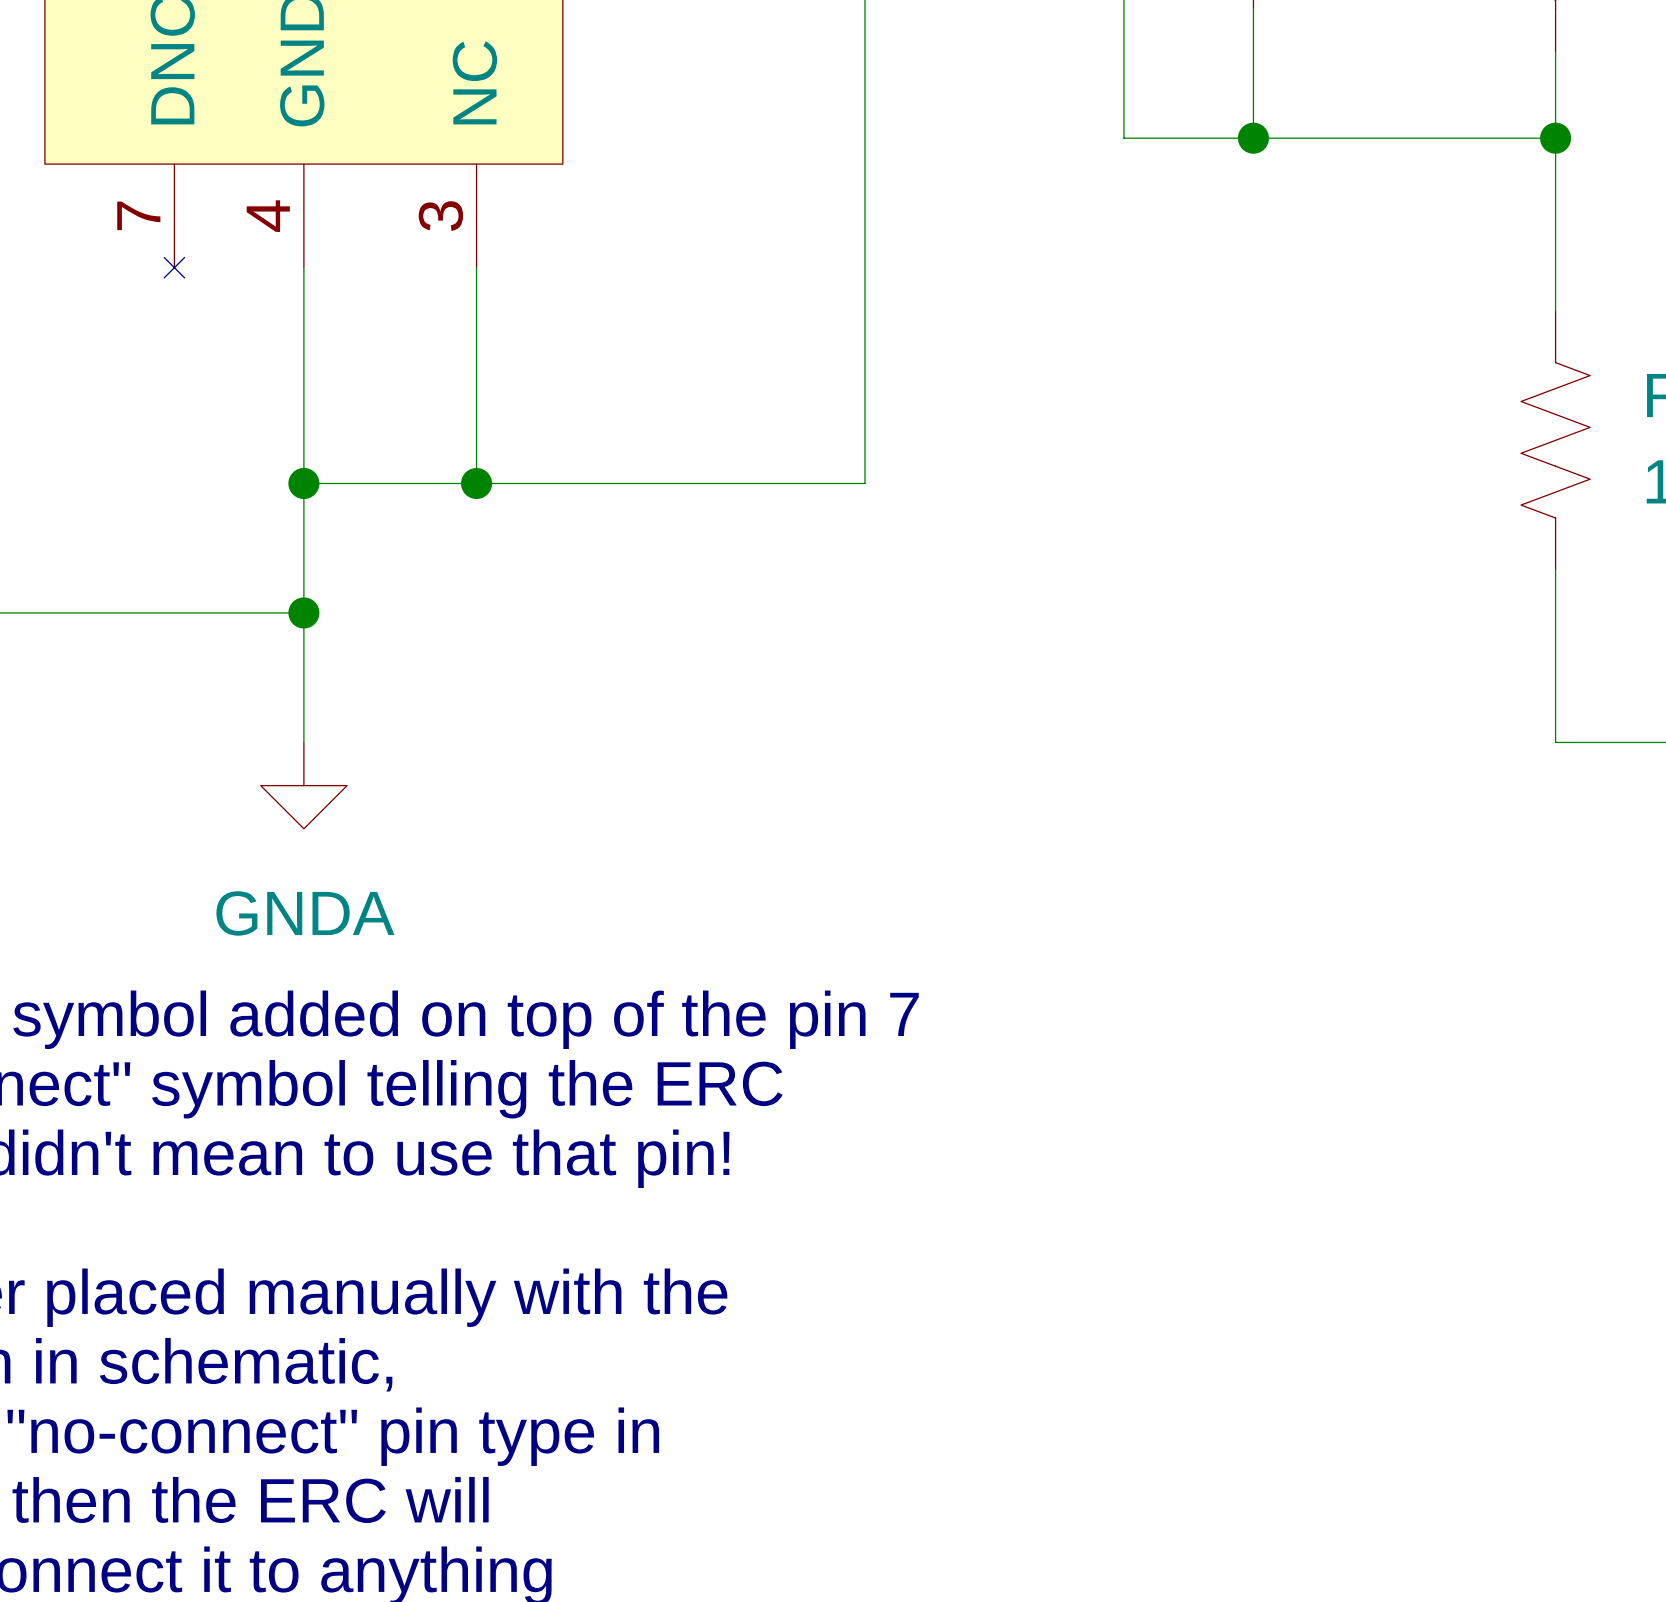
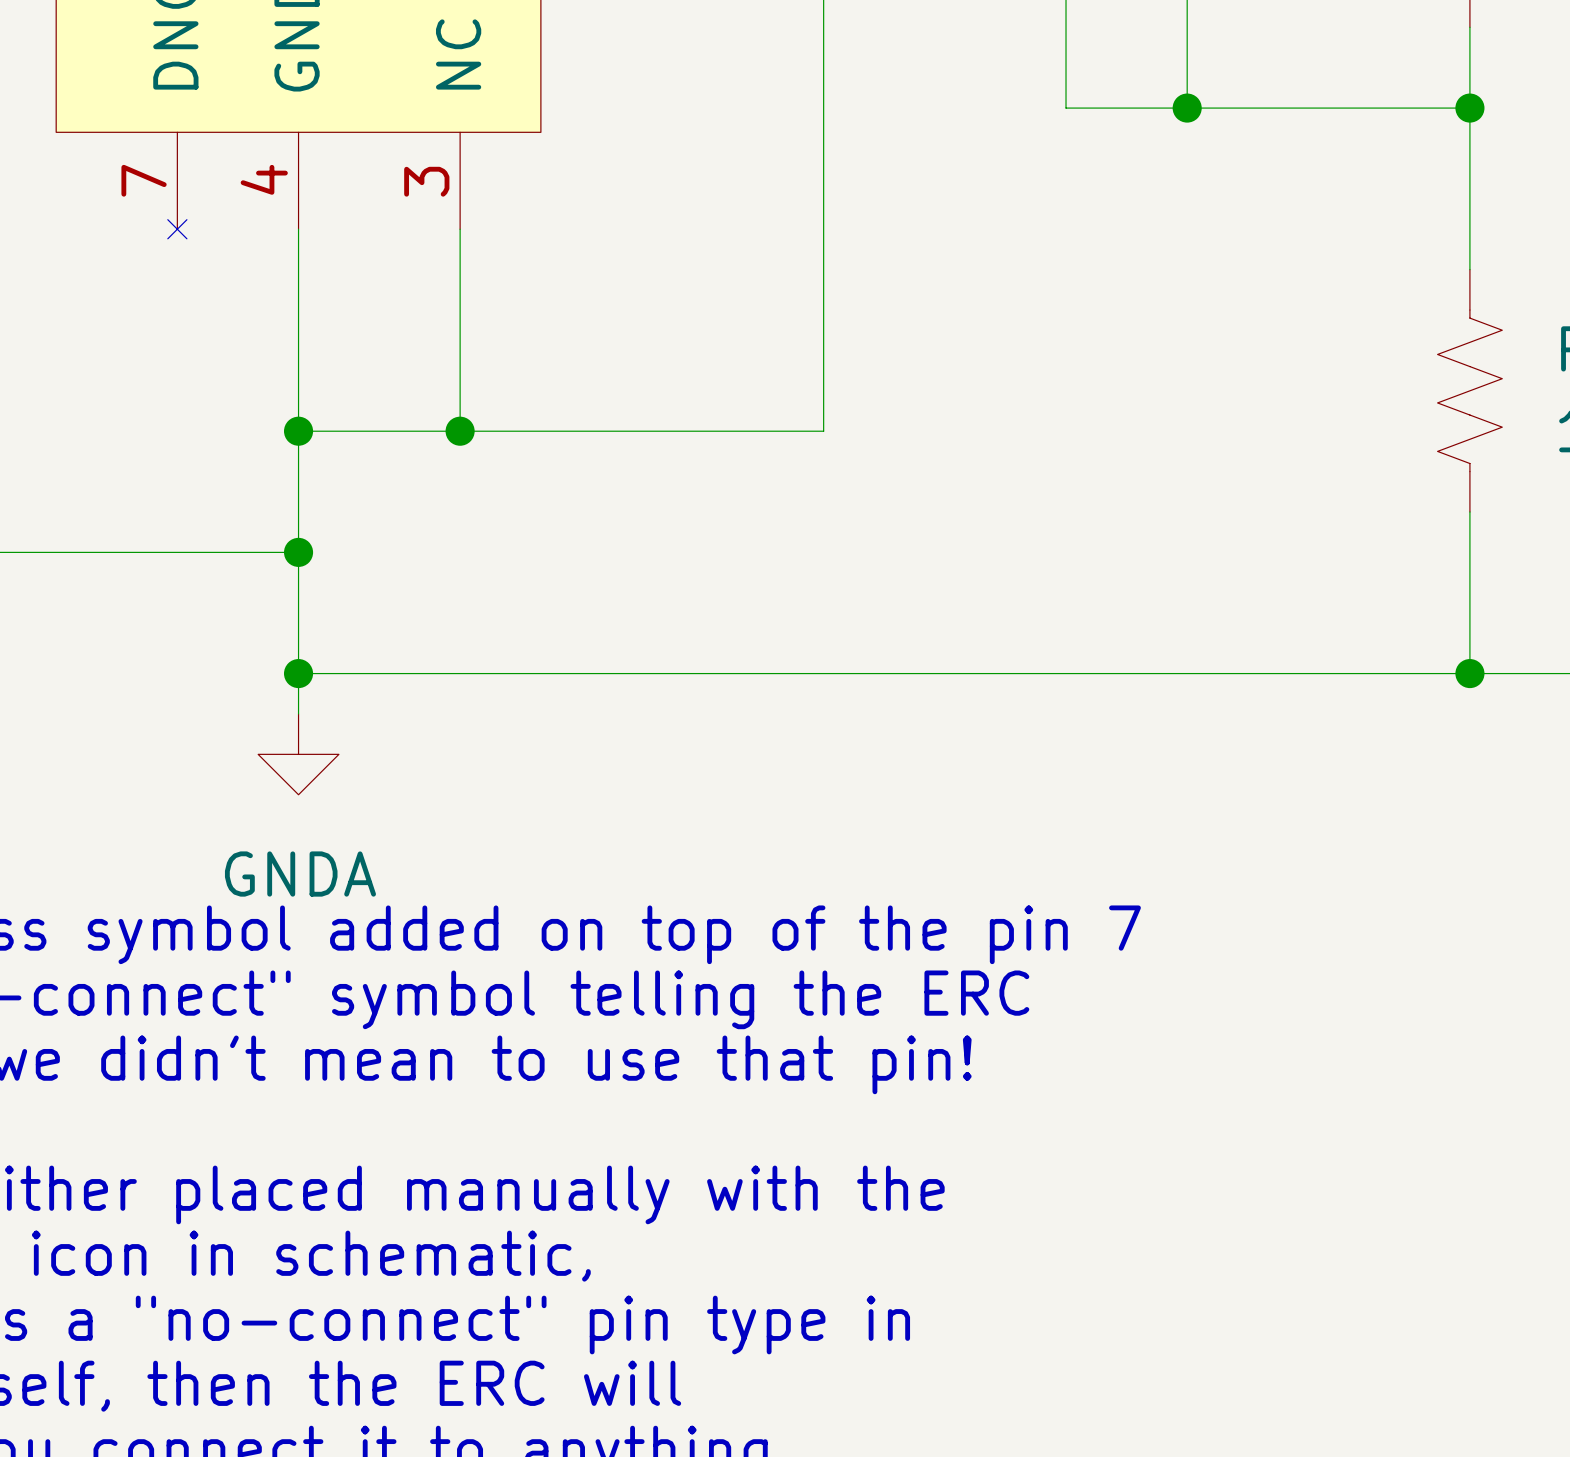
junction: none -> (298, 673)
wire: none -> (1469, 673) (298, 673) (298, 713)
junction: none -> (1469, 673)
power symbol position: GNDA (303, 785) -> GNDA (298, 754)

